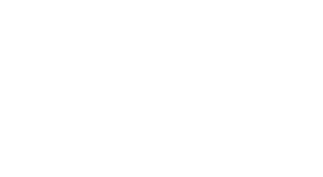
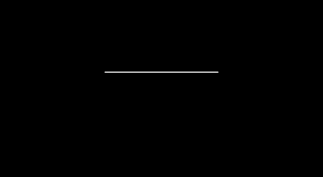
board edge: none -> (105, 72) (218, 72)

